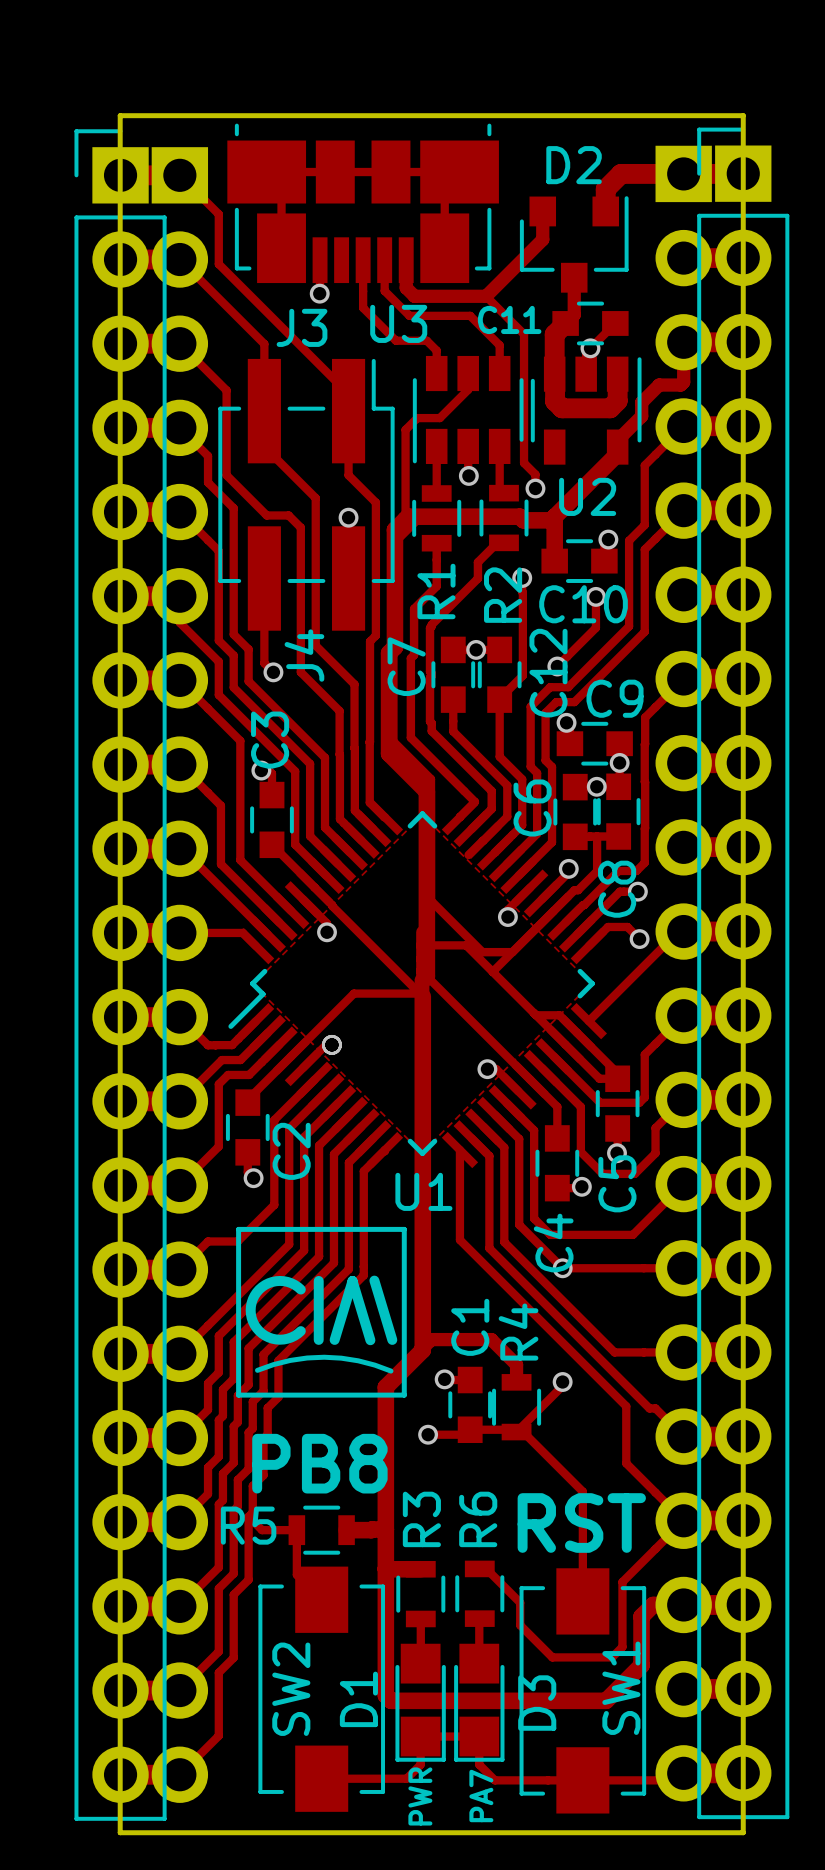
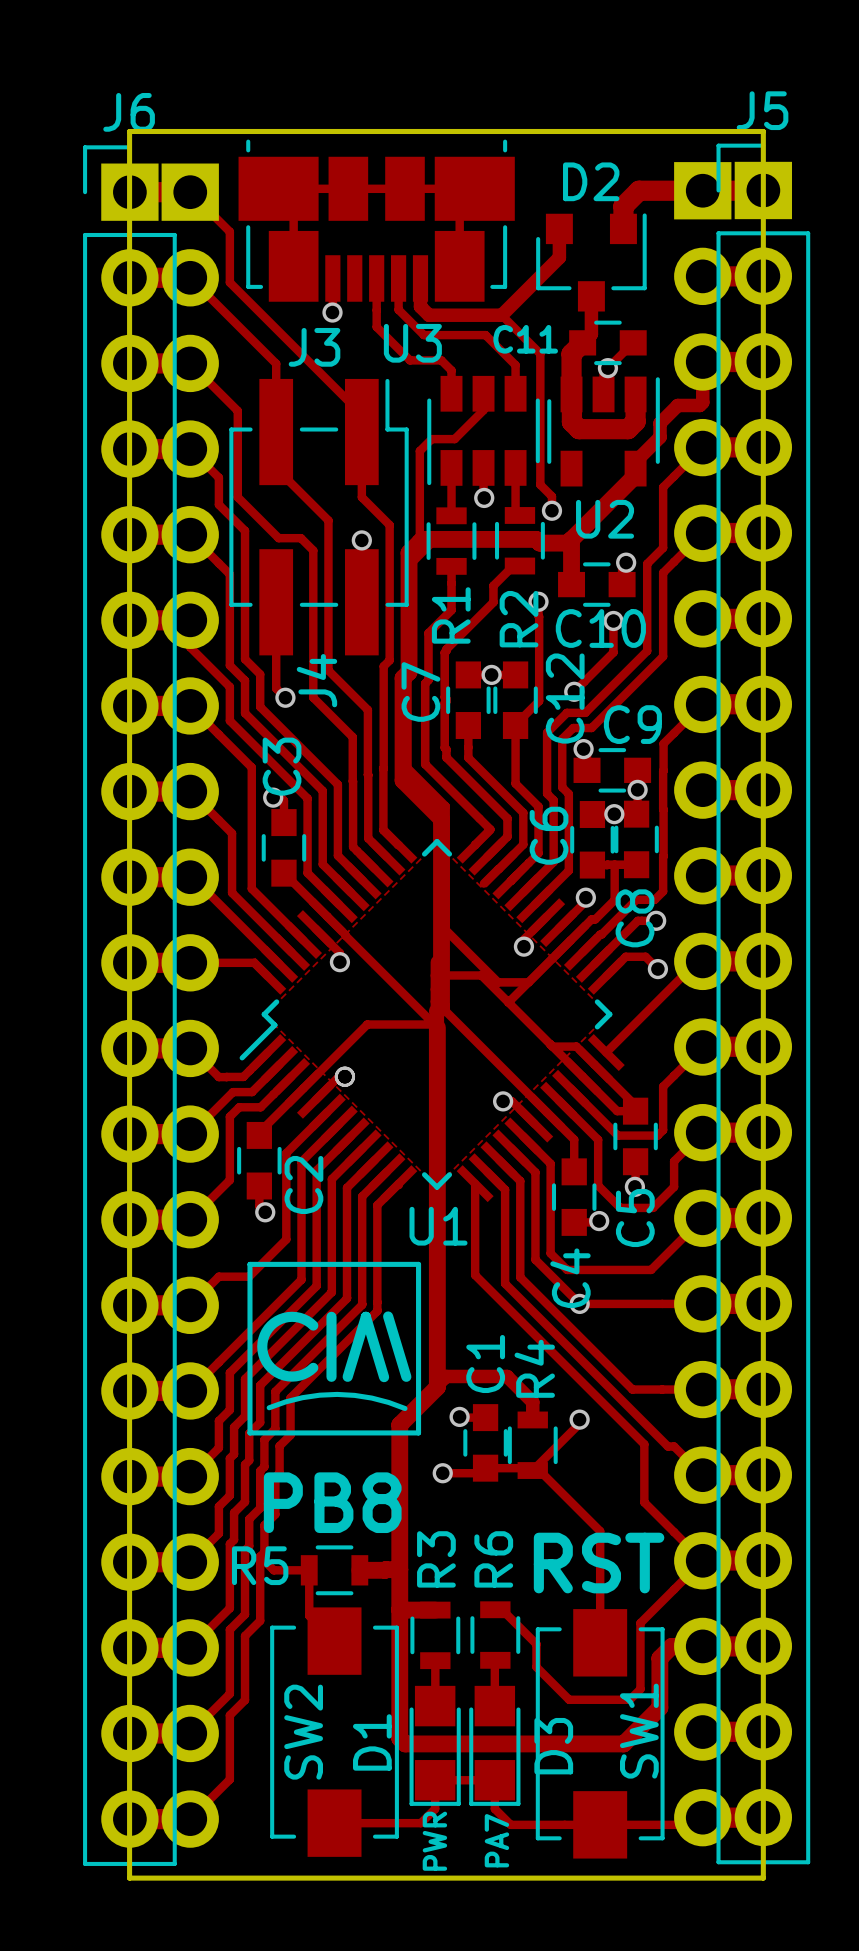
J5 name: none -> J5 (762, 110)
J6 name: none -> J6 (129, 112)

